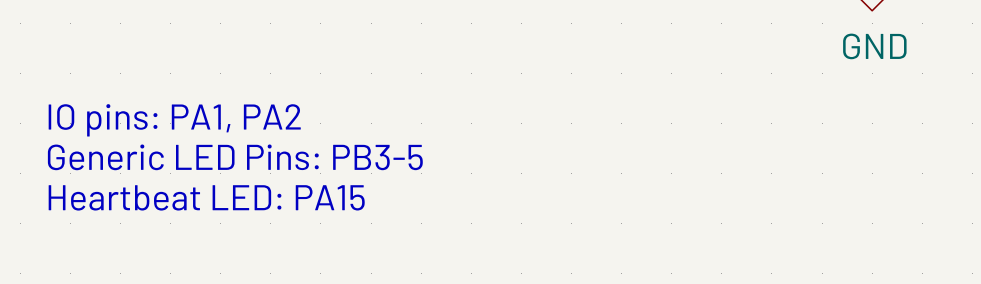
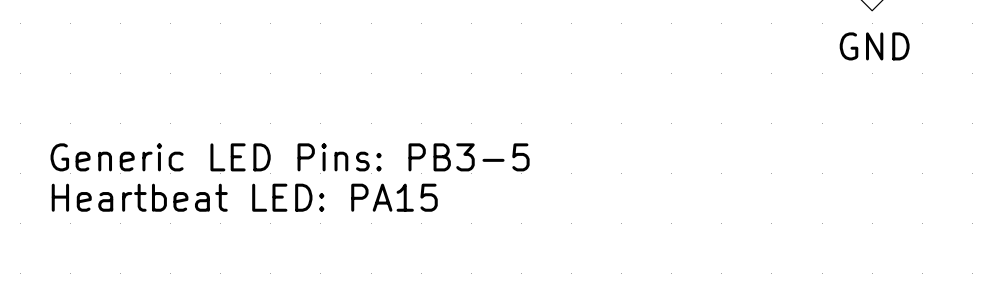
text: IO pins: PA1, PA2 (174, 120) -> none

